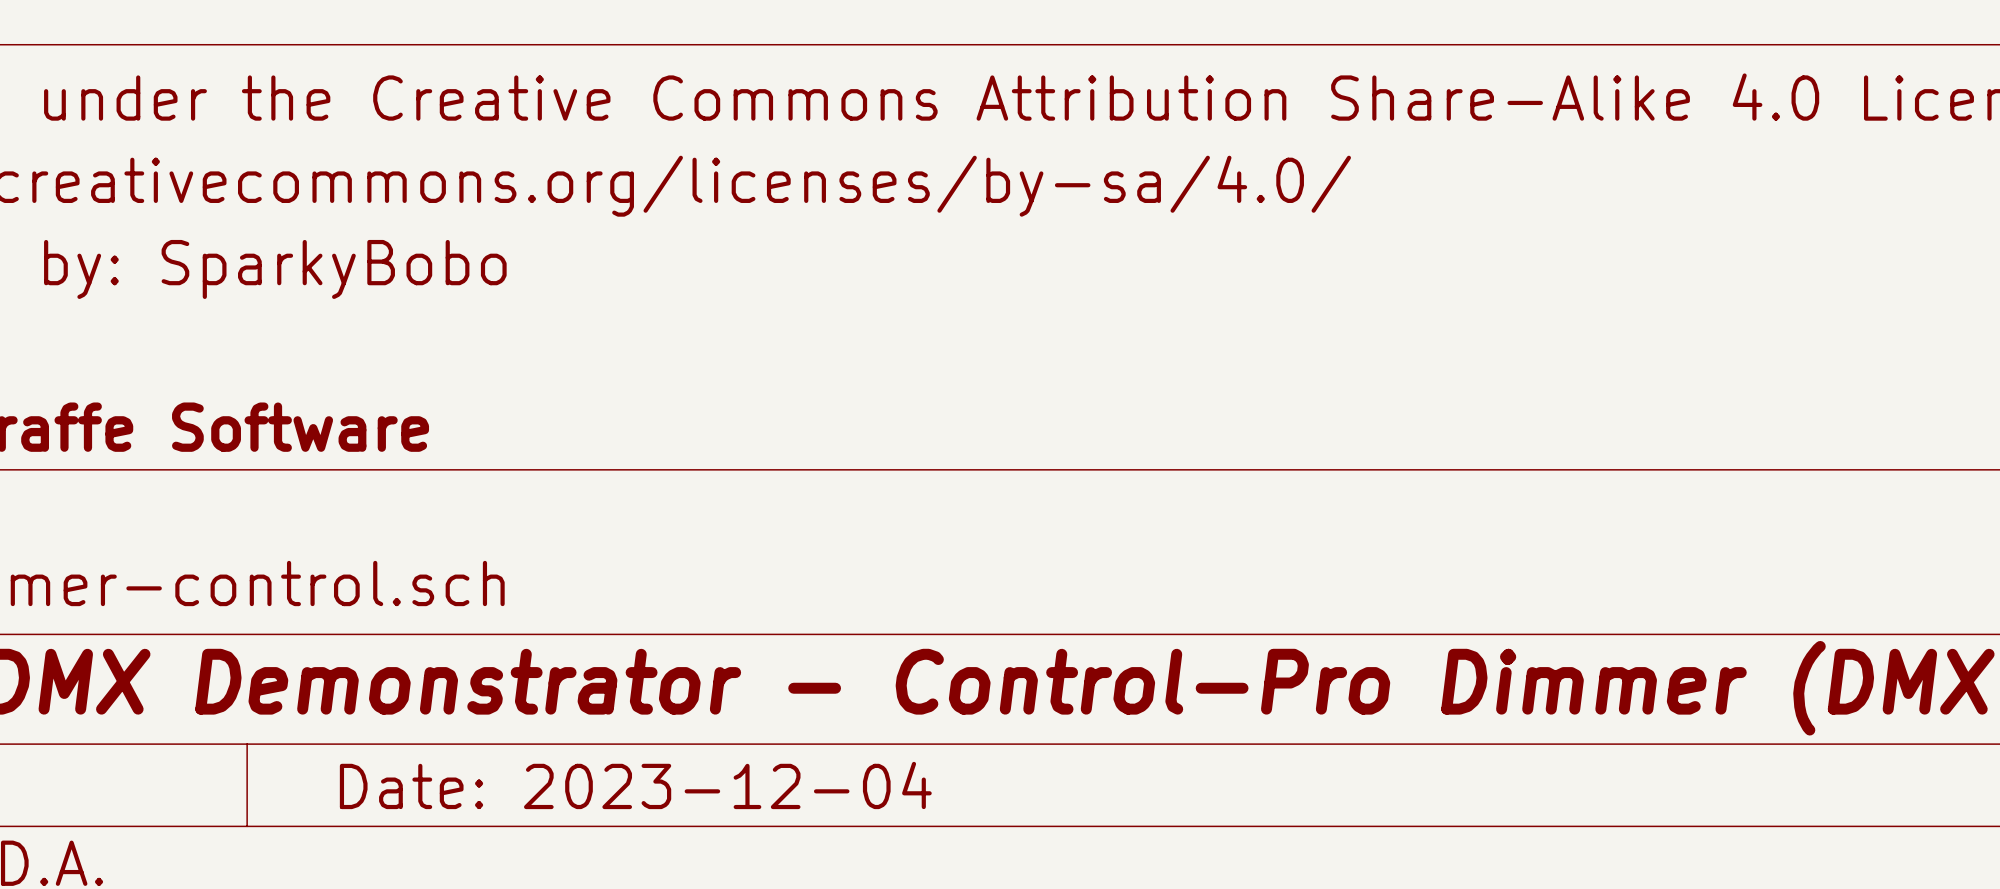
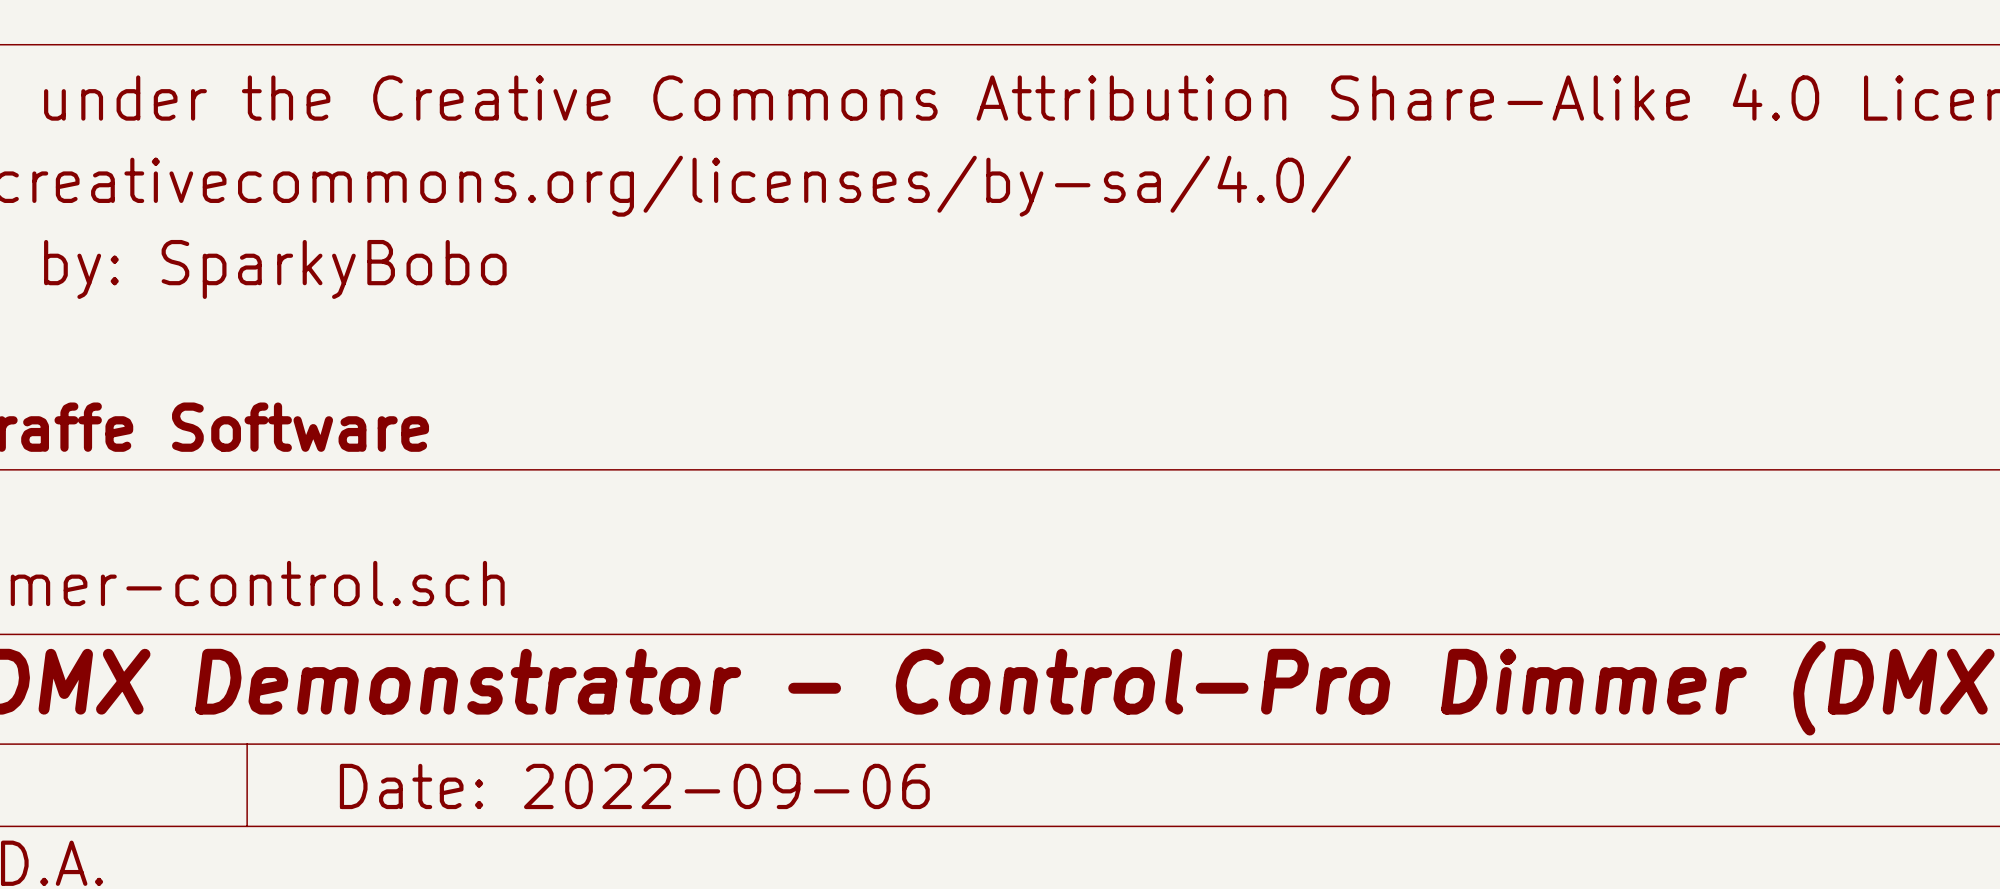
title block: Date: 2023-12-04 (635, 785) -> Date: 2022-09-06 (634, 786)

